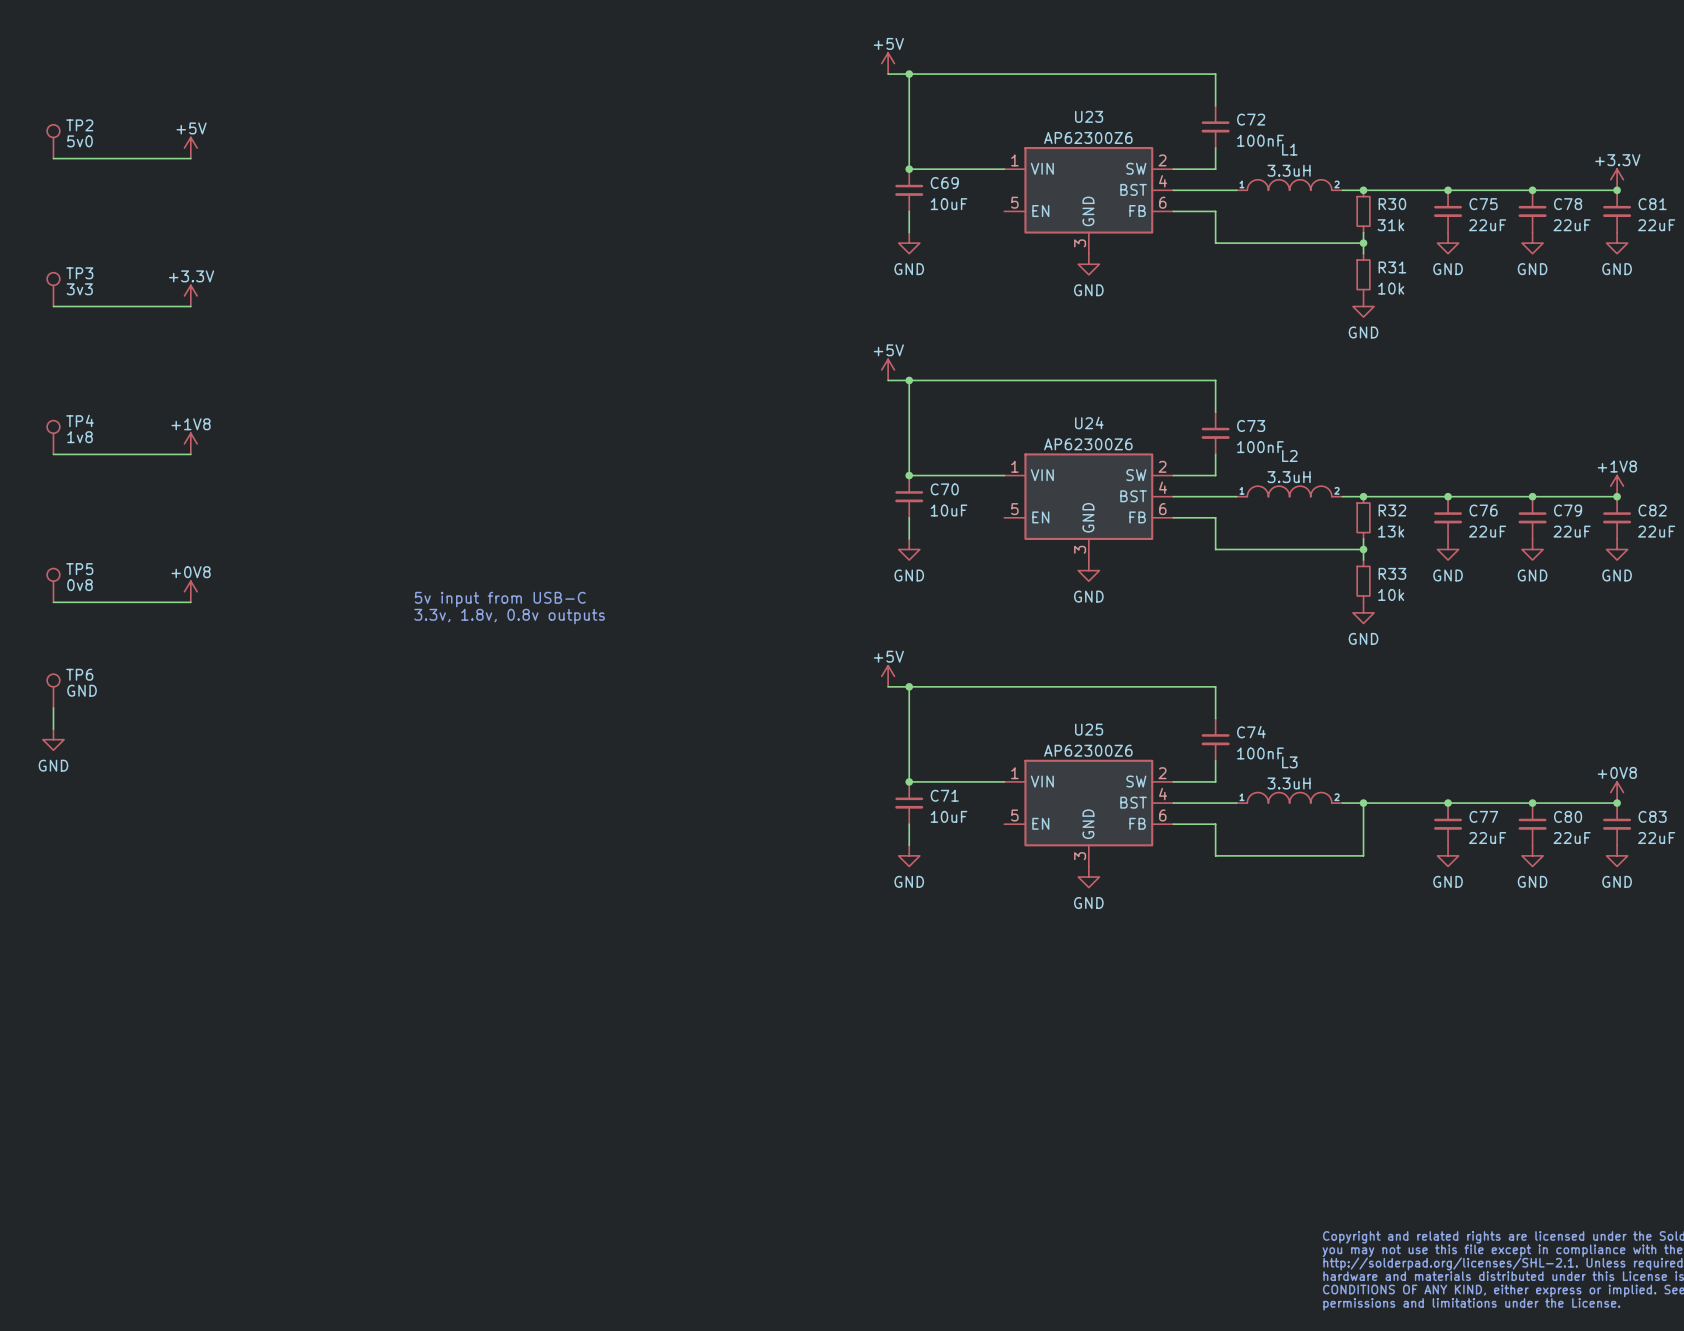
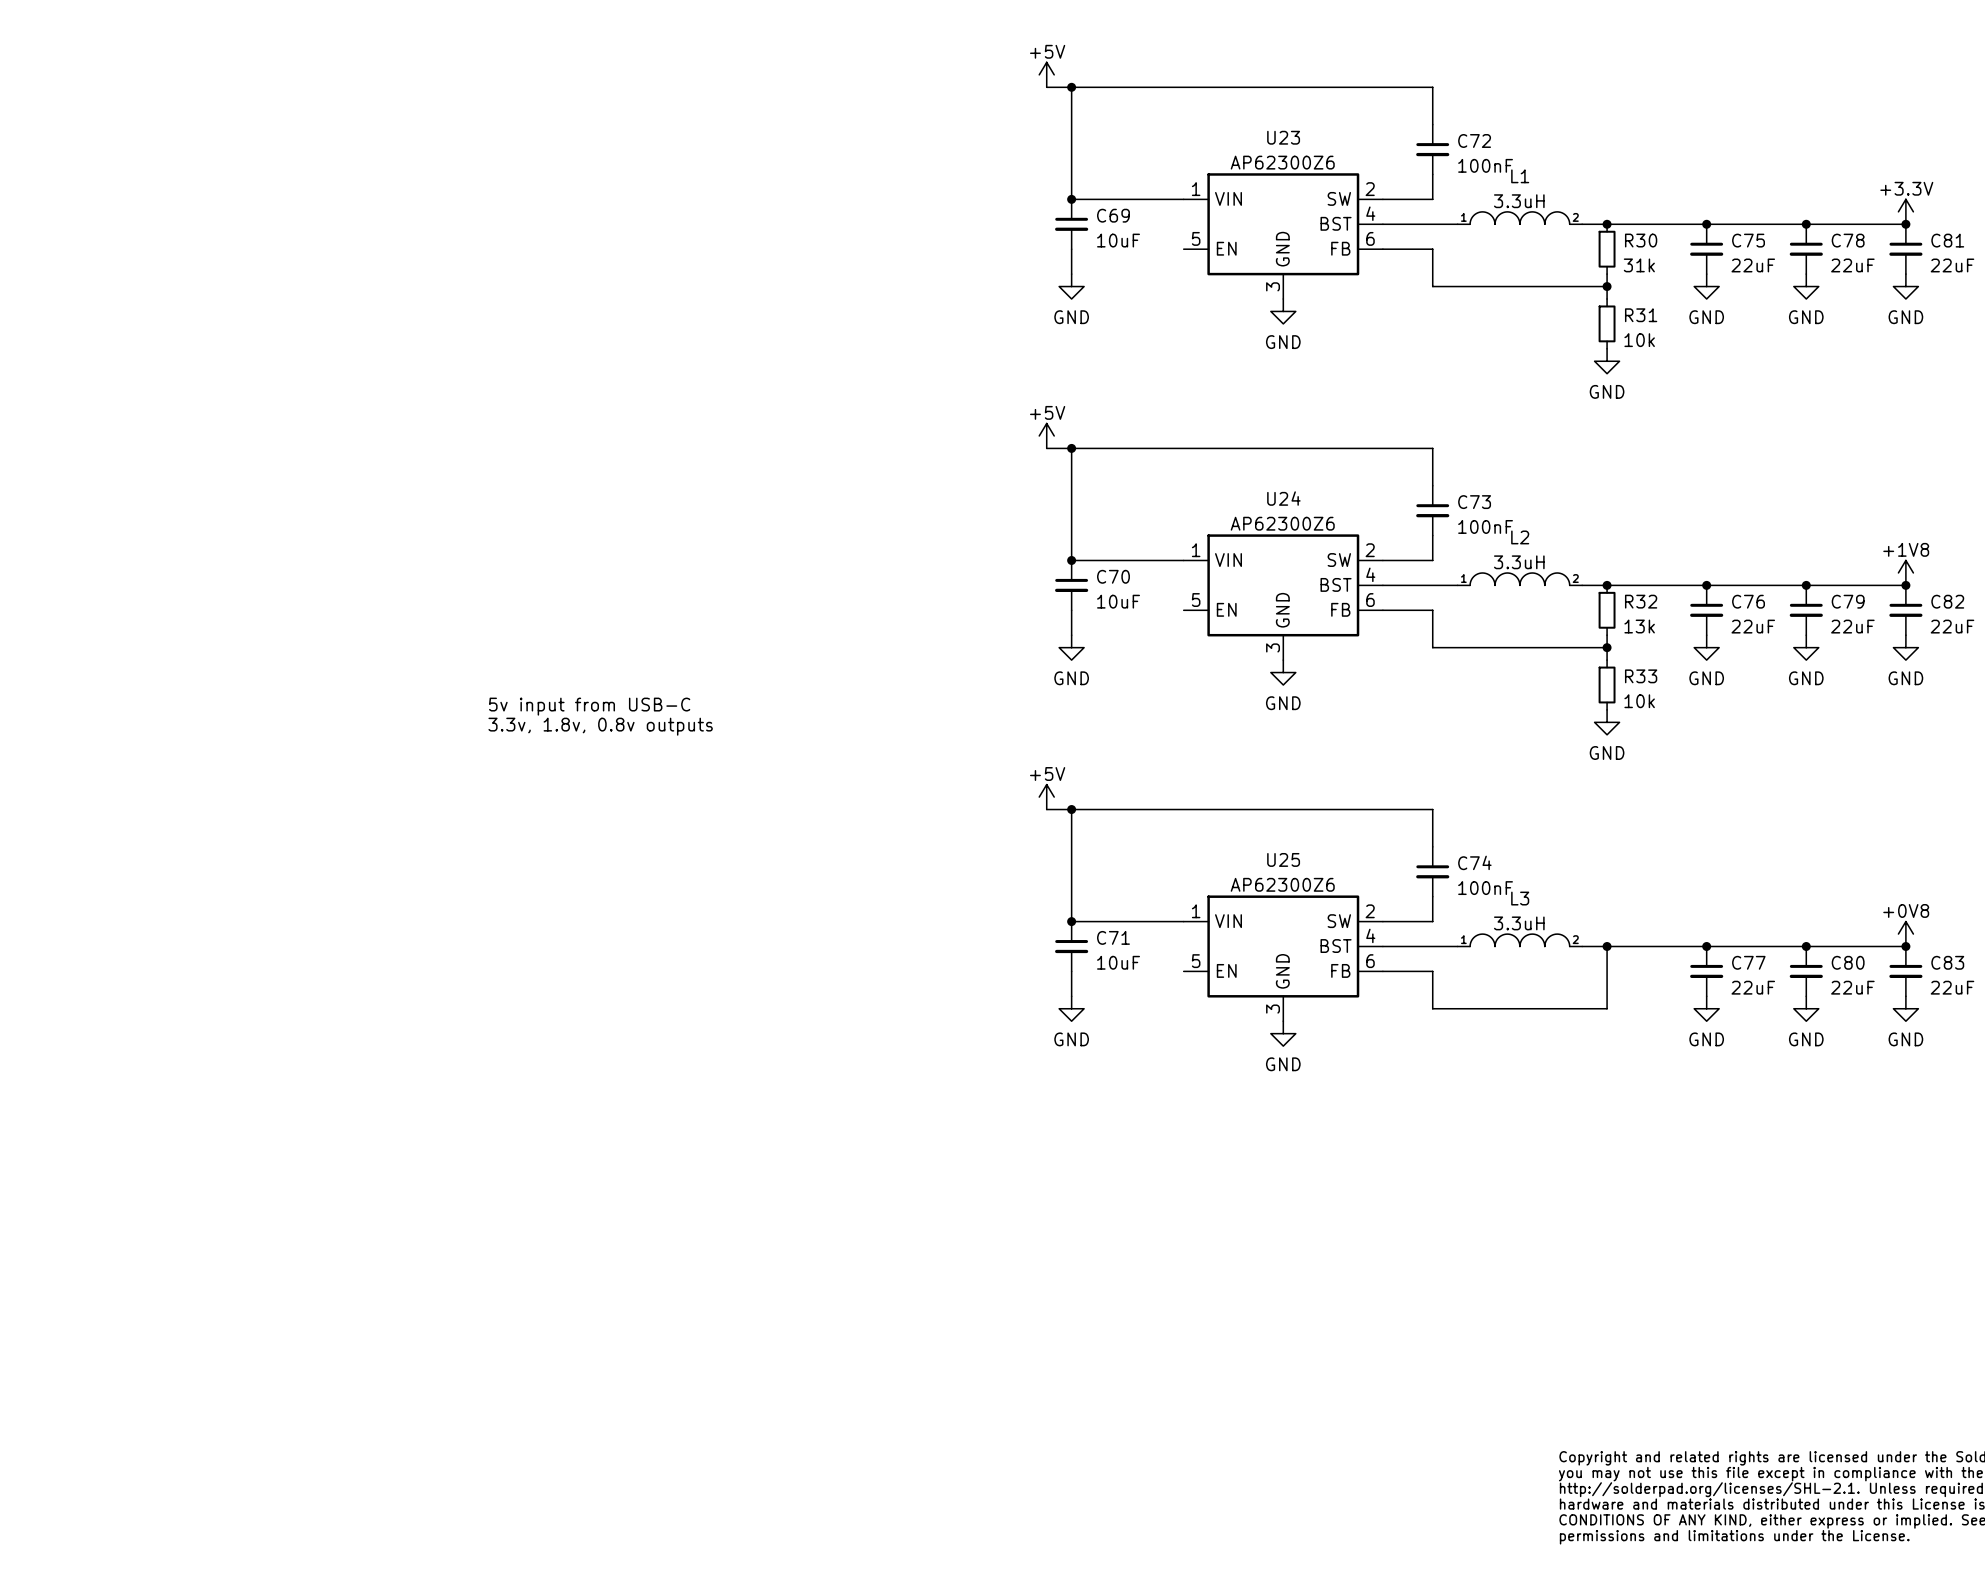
TP2: 5v0 (53, 141) -> none
power symbol: +5V (190, 148) -> none
wire: (53, 158) (190, 158) -> none
TP3: 3v3 (53, 289) -> none
power symbol: +3.3V (190, 295) -> none
wire: (53, 306) (190, 306) -> none
TP4: 1v8 (53, 437) -> none
power symbol: +1V8 (190, 443) -> none
wire: (53, 454) (190, 454) -> none
TP5: 0v8 (53, 585) -> none
power symbol: +0V8 (190, 591) -> none
wire: (53, 602) (190, 602) -> none
TP6: GND (53, 691) -> none
wire: (53, 707) (53, 729) -> none
power symbol: GND (53, 739) -> none

